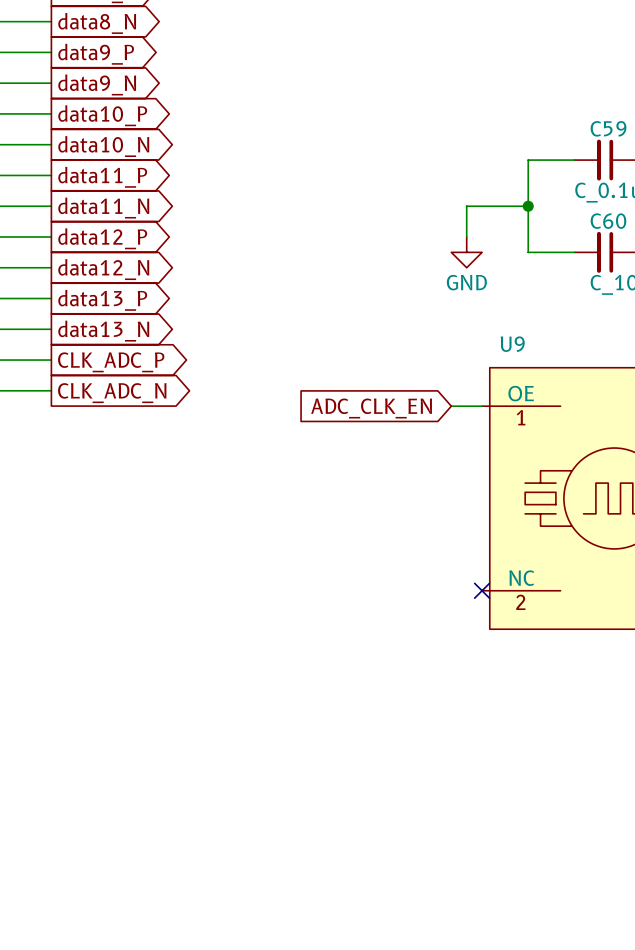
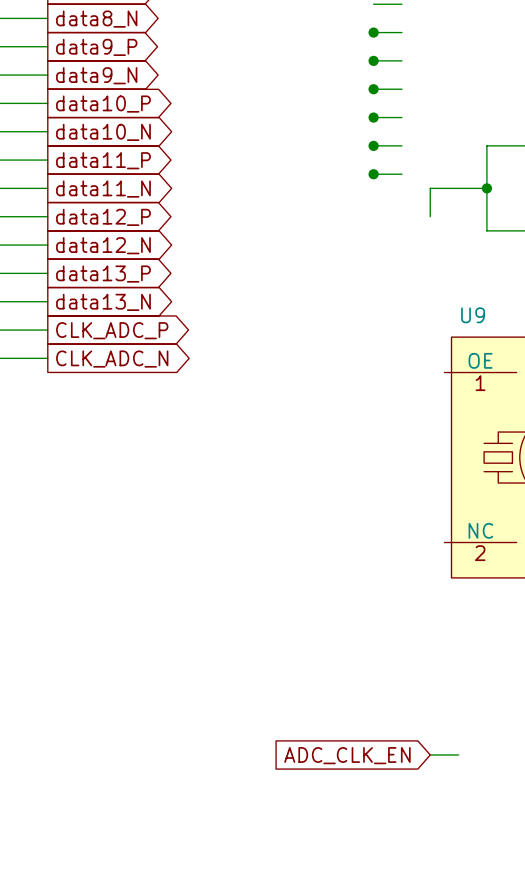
wire: none -> (373, 4) (401, 4)
wire: none -> (373, 32) (401, 32)
junction: none -> (373, 32)
wire: none -> (373, 60) (401, 60)
junction: none -> (373, 60)
wire: none -> (373, 89) (401, 89)
junction: none -> (373, 89)
wire: none -> (373, 117) (401, 117)
junction: none -> (373, 117)
wire: none -> (373, 145) (401, 145)
junction: none -> (373, 145)
junction: none -> (373, 174)
power symbol: GND (466, 252) -> none
wire: (451, 406) (482, 406) -> (373, 174) (401, 174)
global label: ADC_CLK_EN (371, 408) -> none
no-connect mark: (482, 590) -> none
wire: none -> (430, 754) (458, 754)
global label: none -> ADC_CLK_EN (347, 755)

